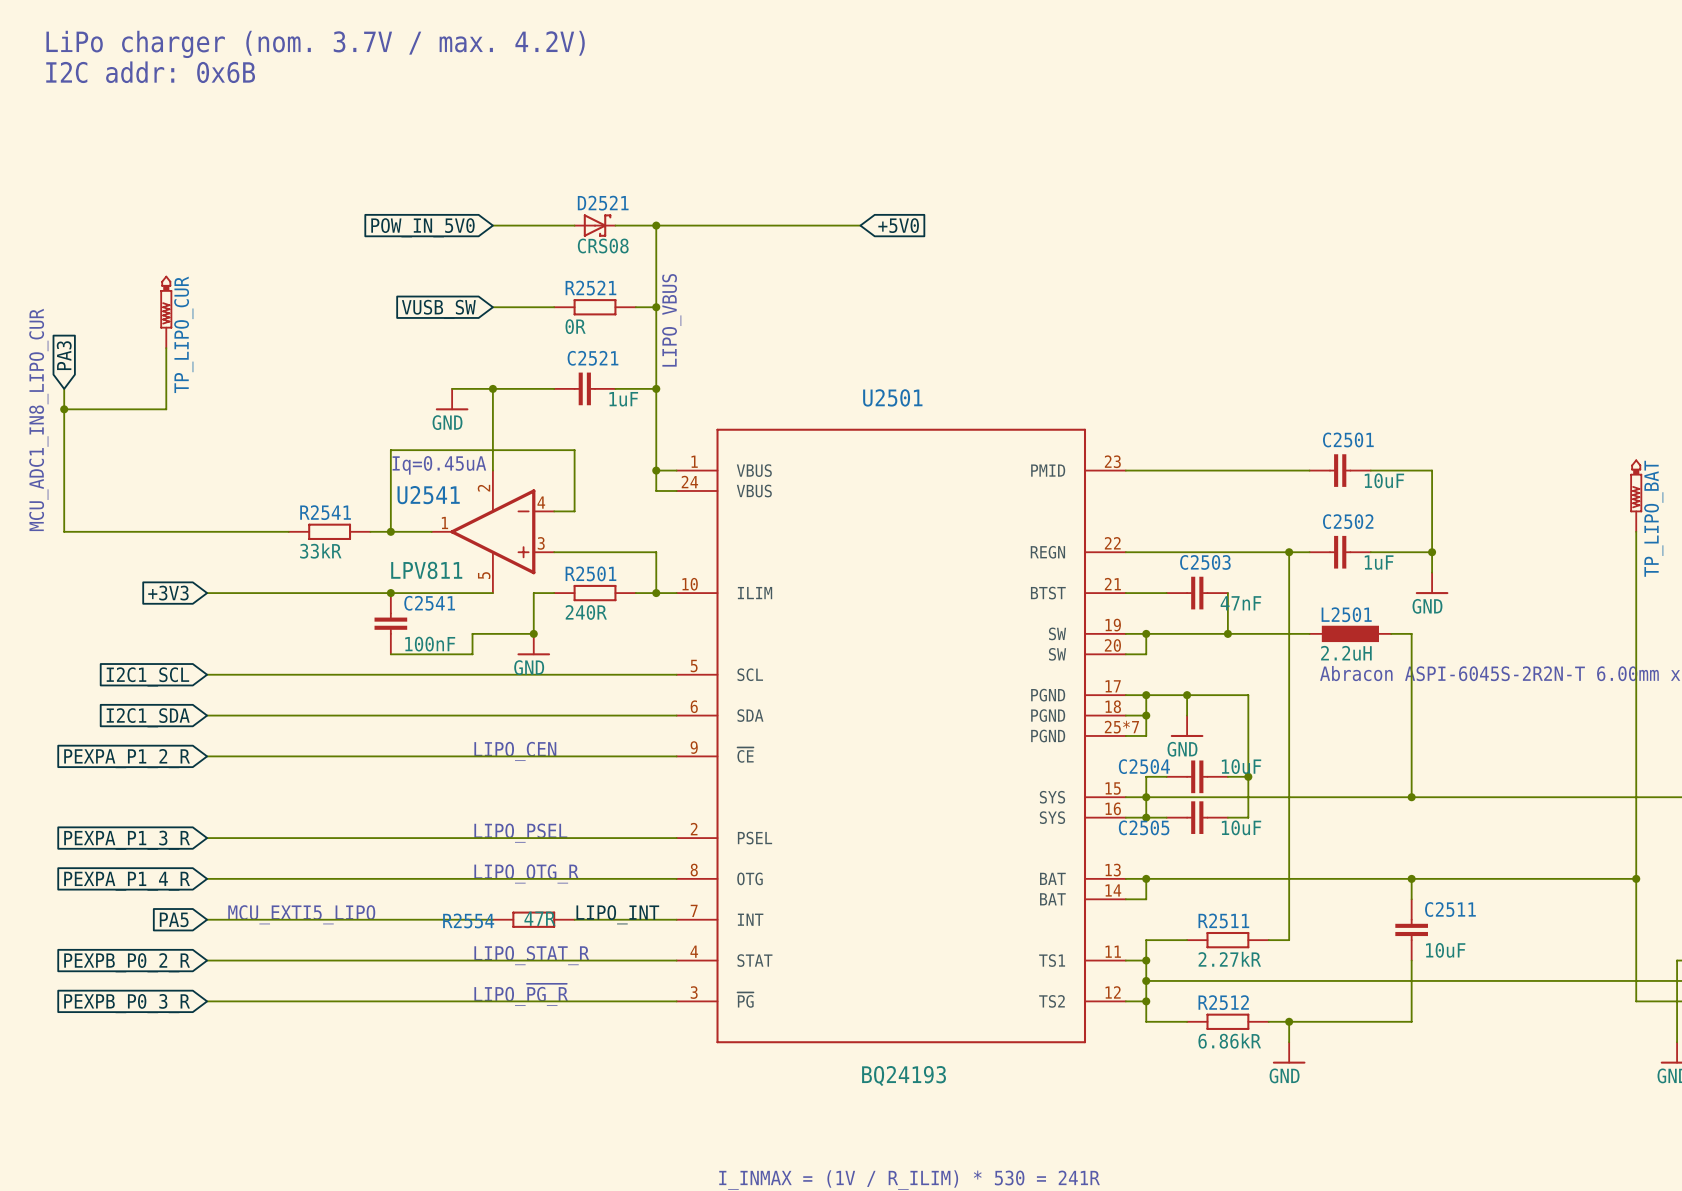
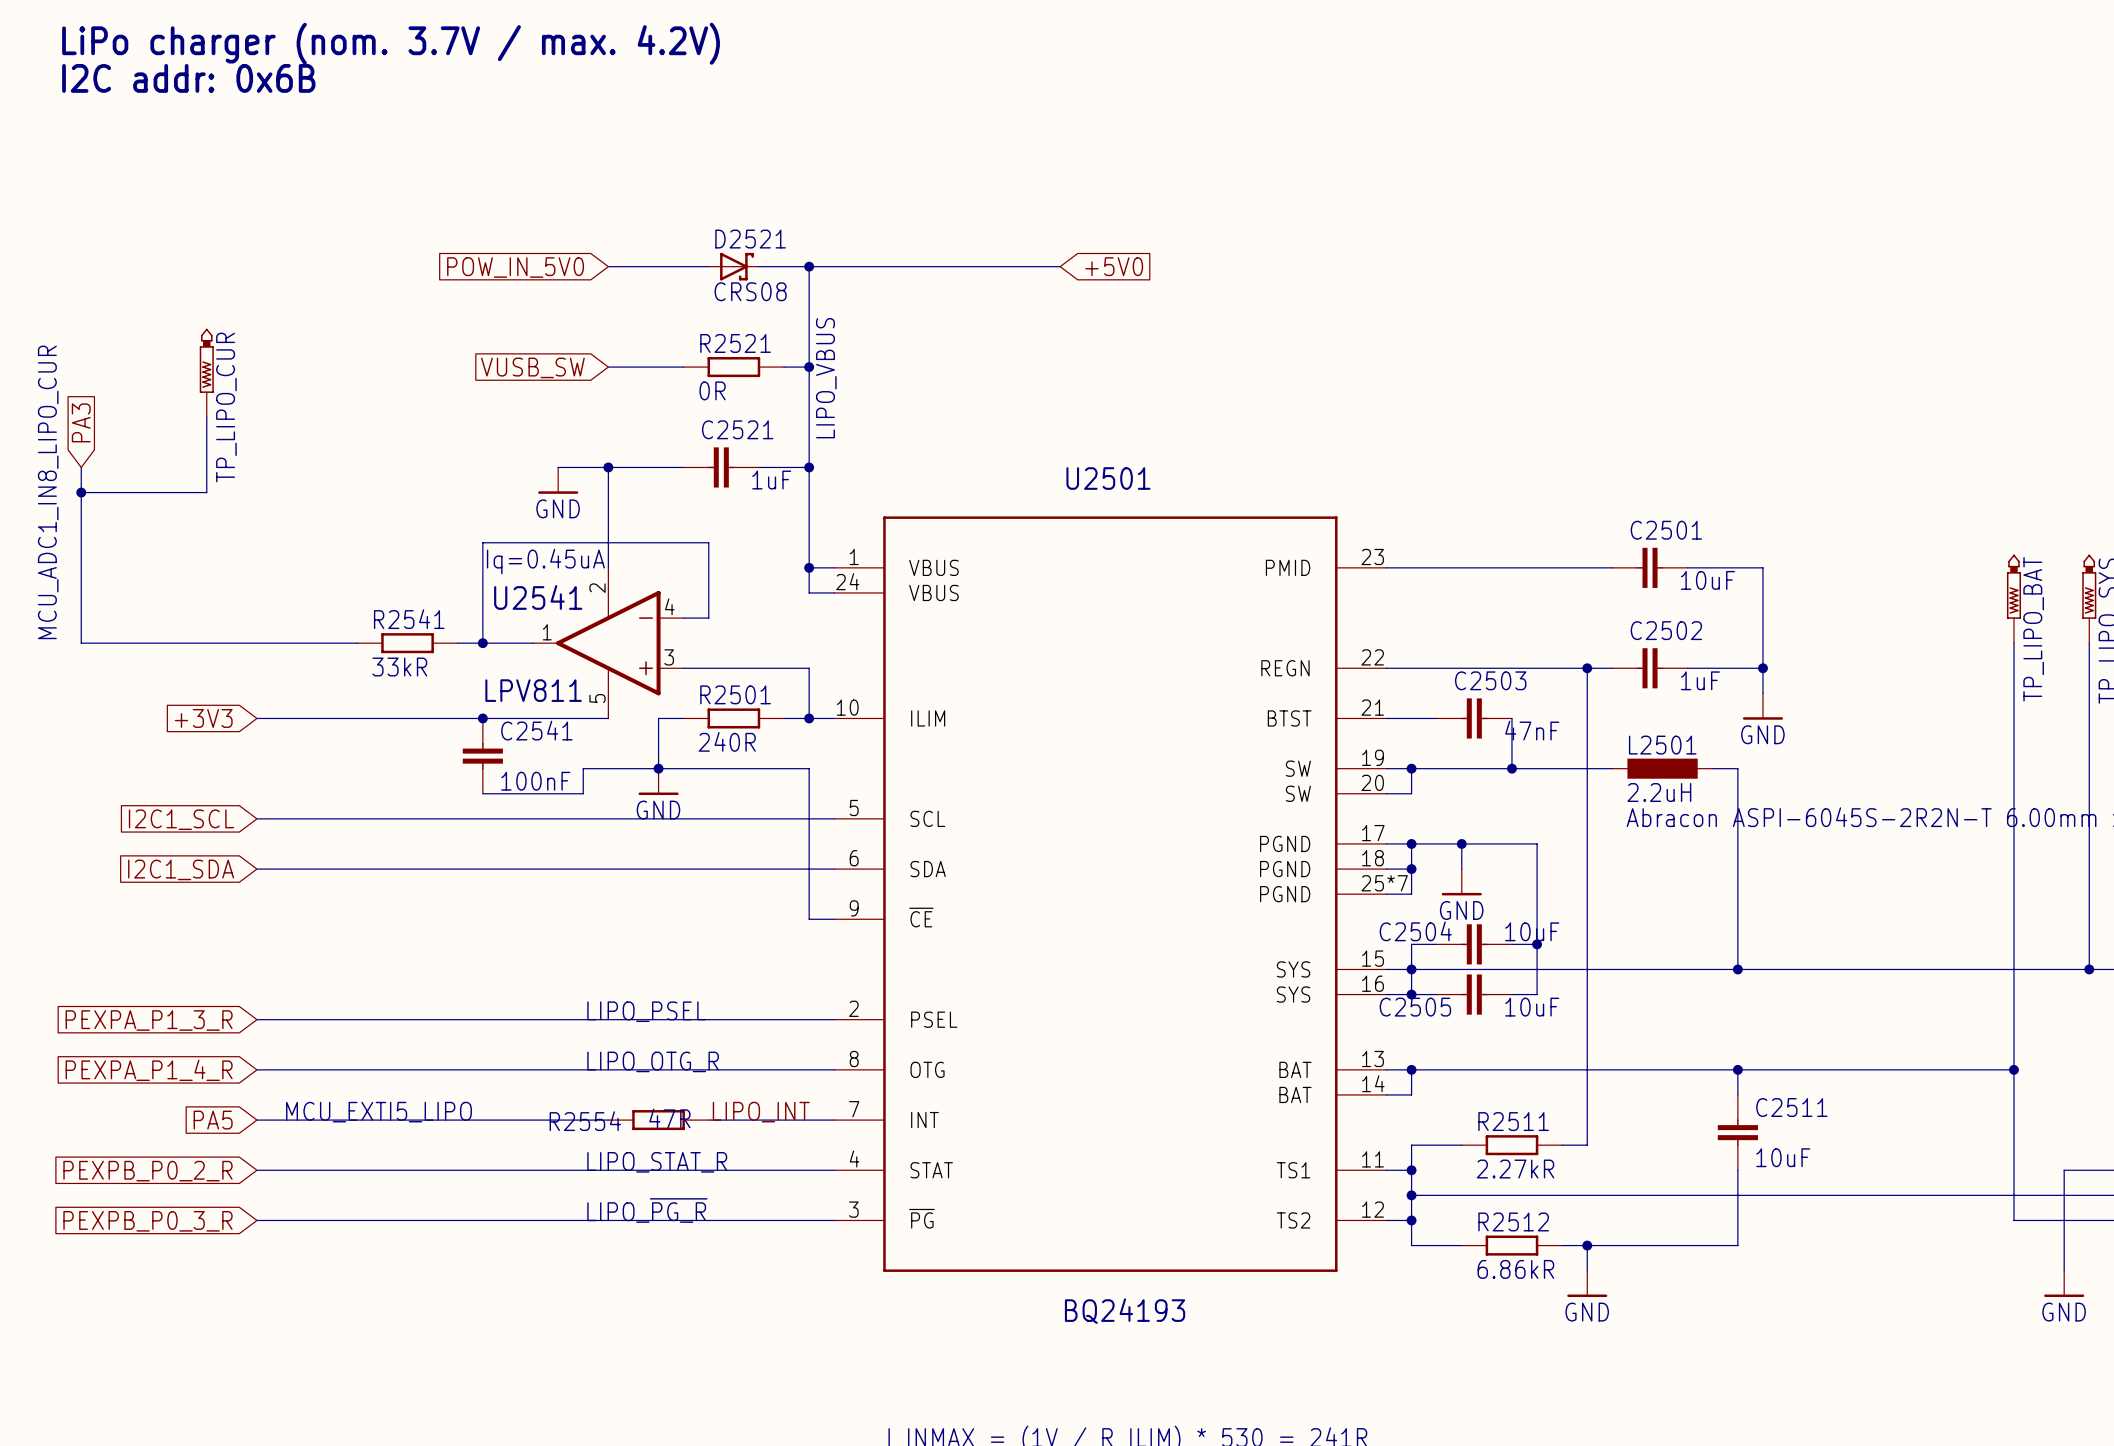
text: LIPO_CEN (515, 751) -> none
wire: (207, 756) (656, 756) -> (658, 768) (809, 768) (809, 919)
global label: PEXPA_P1_2_R (127, 758) -> none

